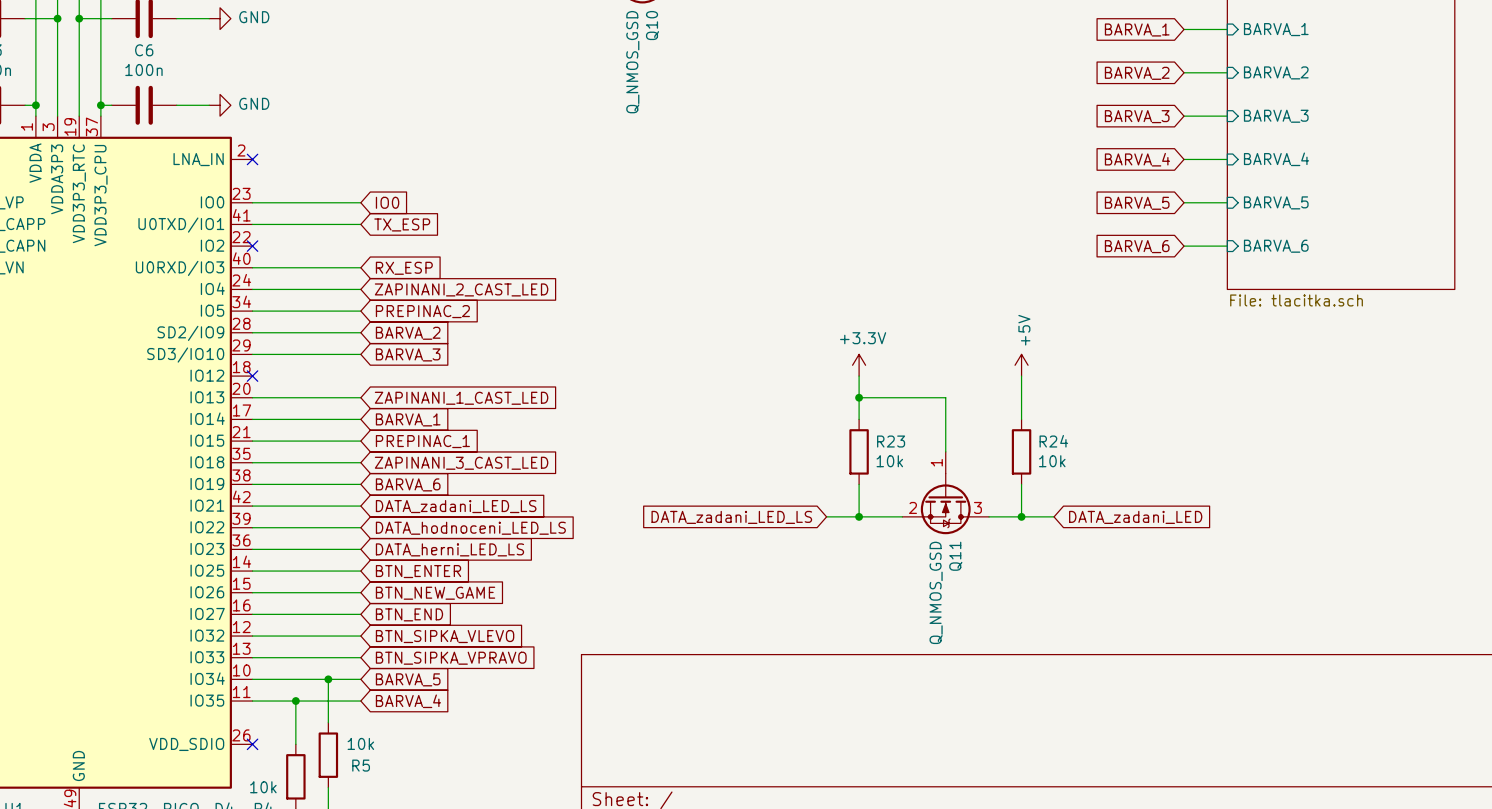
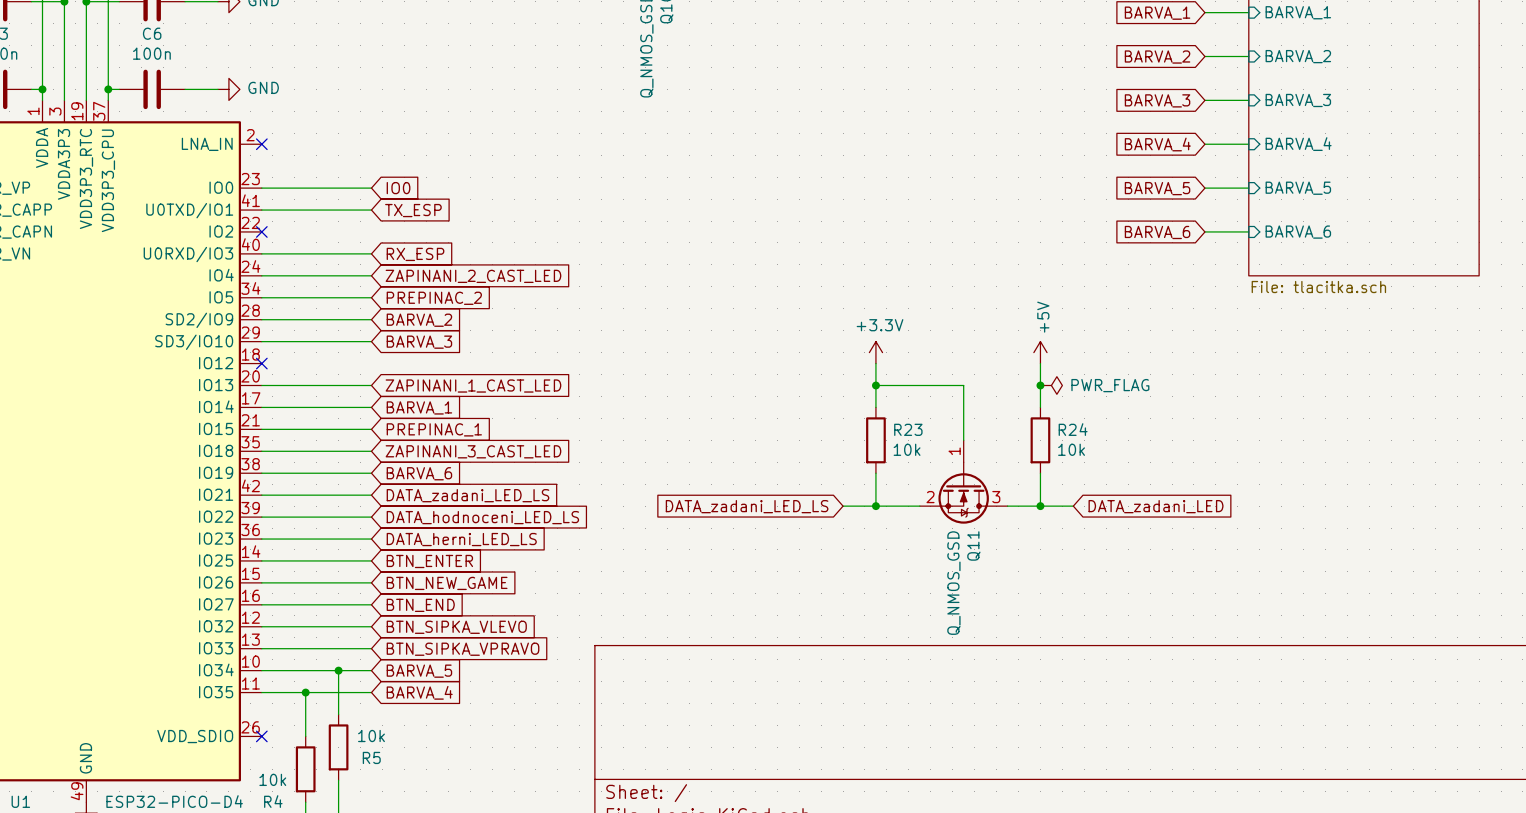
junction: none -> (1040, 385)
power symbol: none -> PWR_FLAG (1051, 385)

